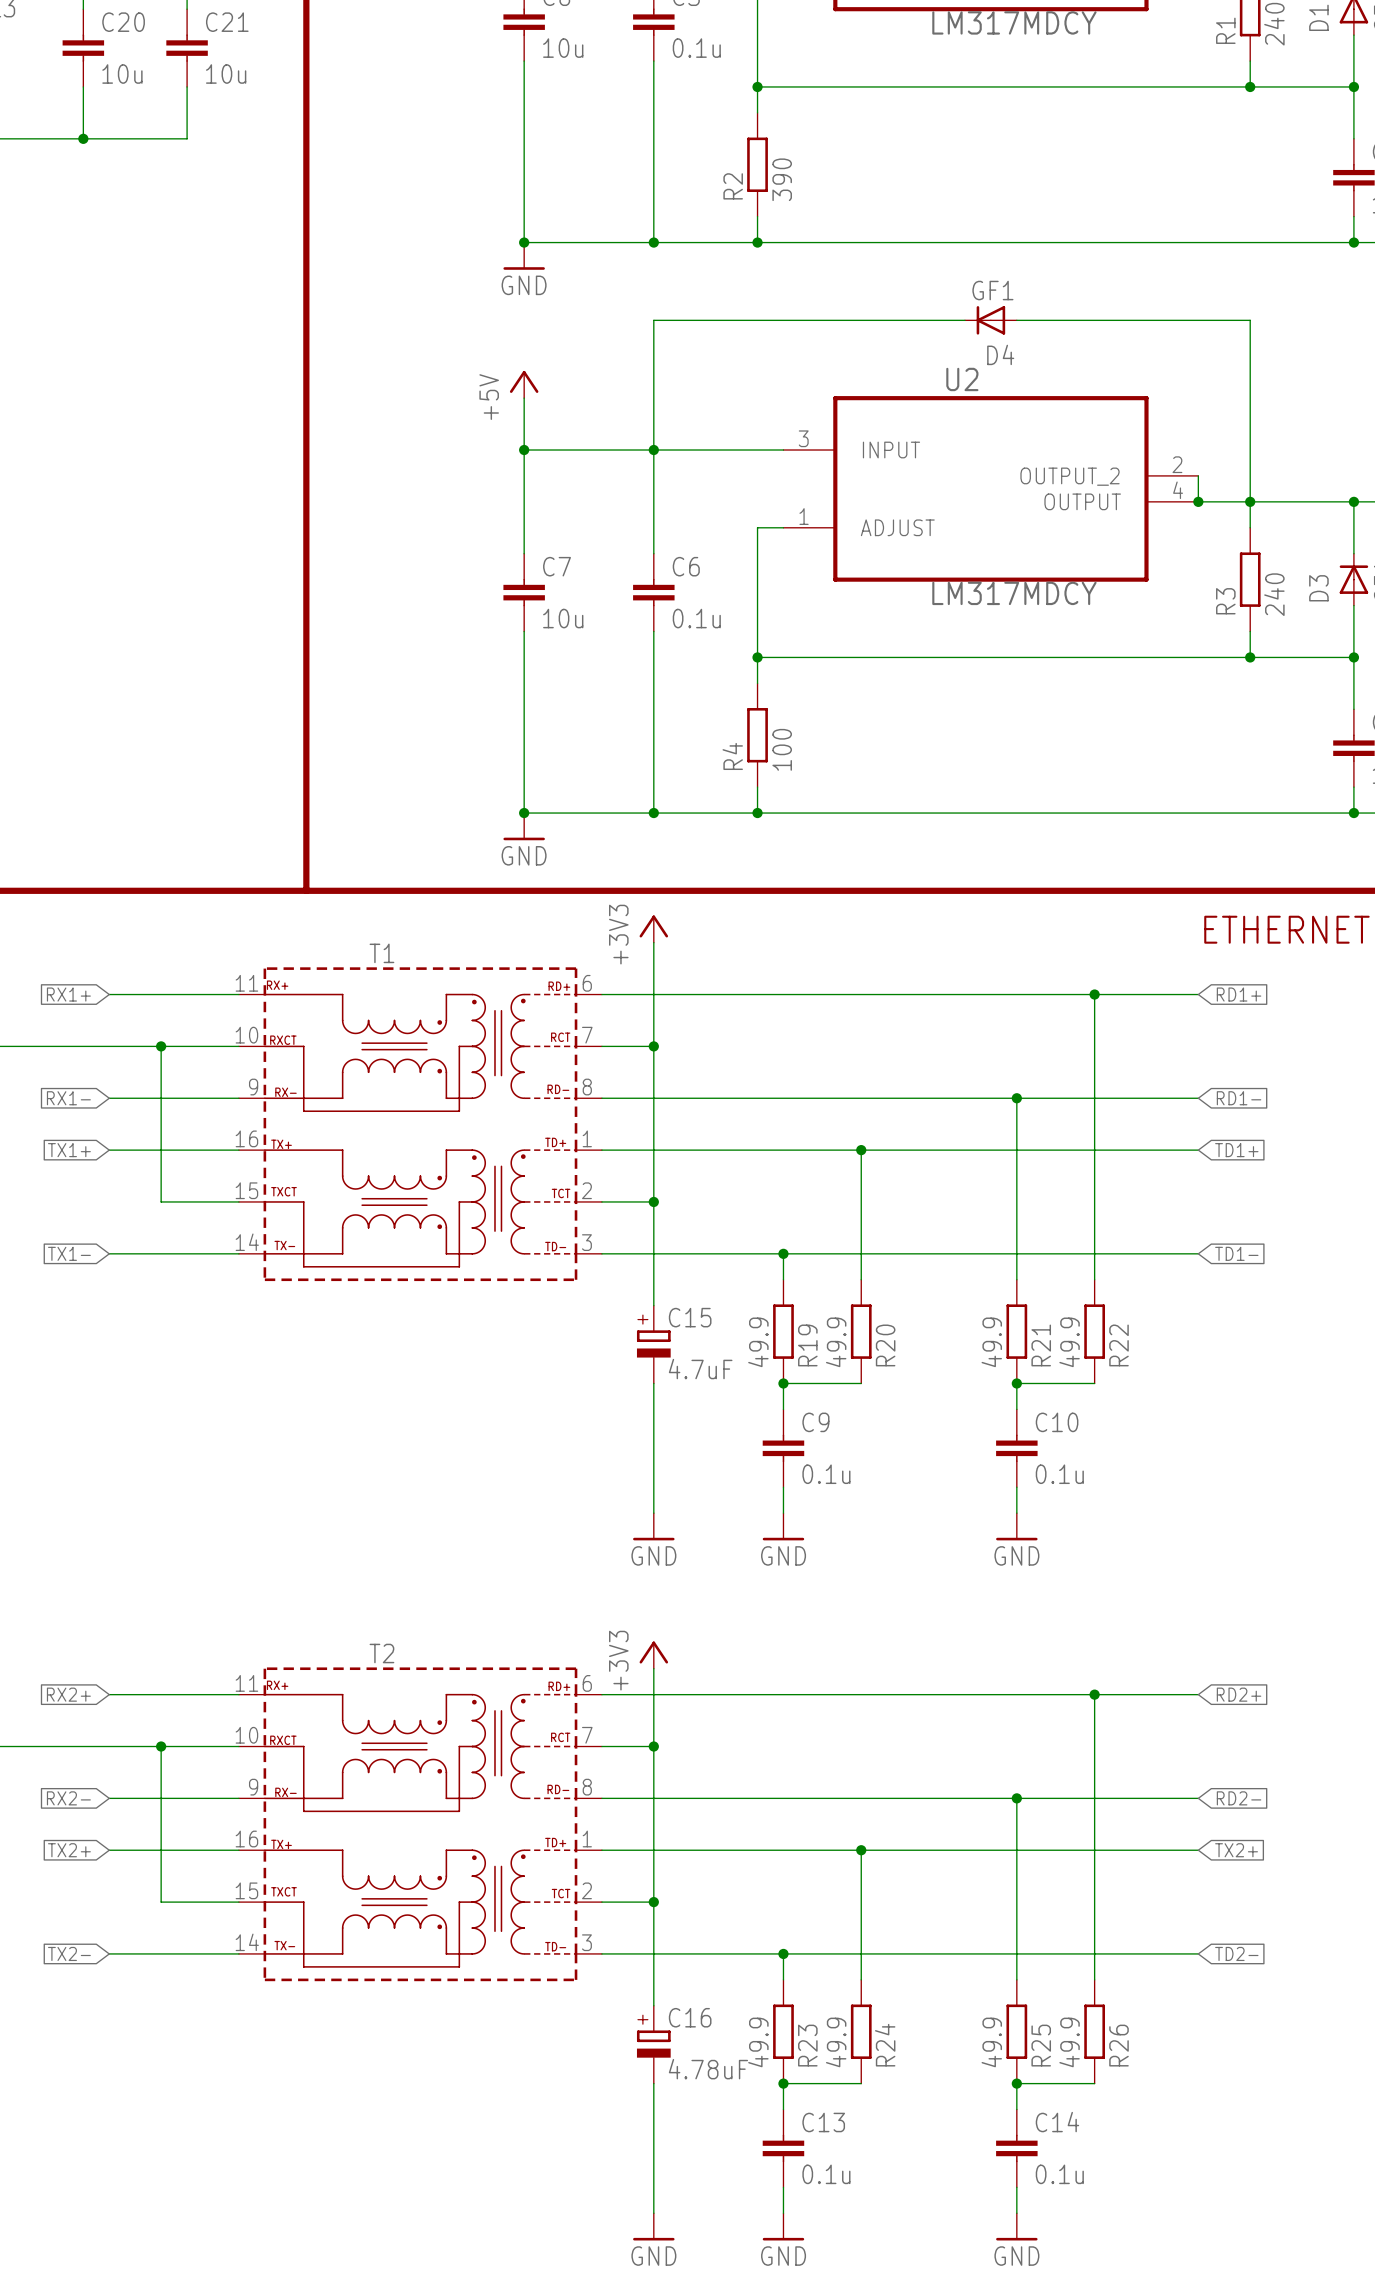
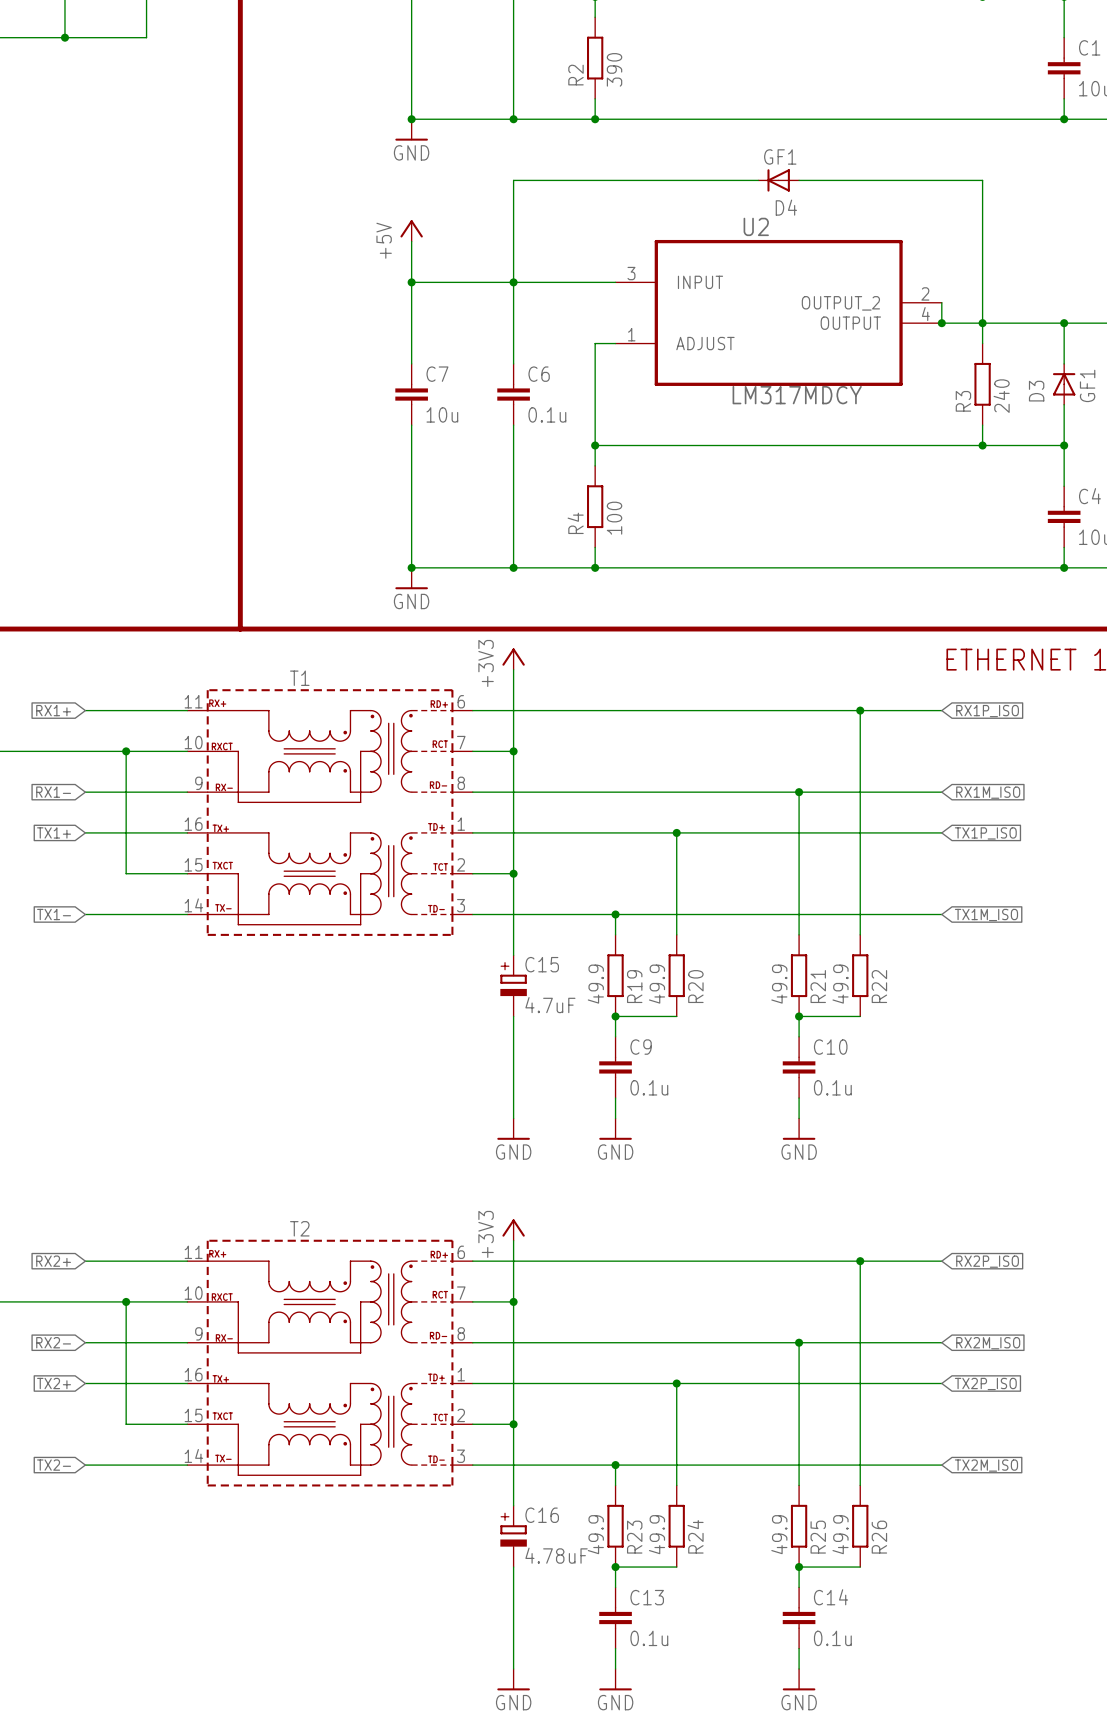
global label: RD1+ (1239, 994) -> RX1P_ISO (987, 711)
global label: RD1- (1239, 1098) -> RX1M_ISO (988, 792)
global label: TD1+ (1236, 1150) -> TX1P_ISO (985, 833)
global label: TD1- (1236, 1253) -> TX1M_ISO (986, 914)
global label: RD2+ (1239, 1694) -> RX2P_ISO (987, 1261)
global label: RD2- (1239, 1798) -> RX2M_ISO (988, 1343)
global label: TX2+ (1236, 1850) -> TX2P_ISO (985, 1383)
global label: TD2- (1236, 1953) -> TX2M_ISO (986, 1465)

